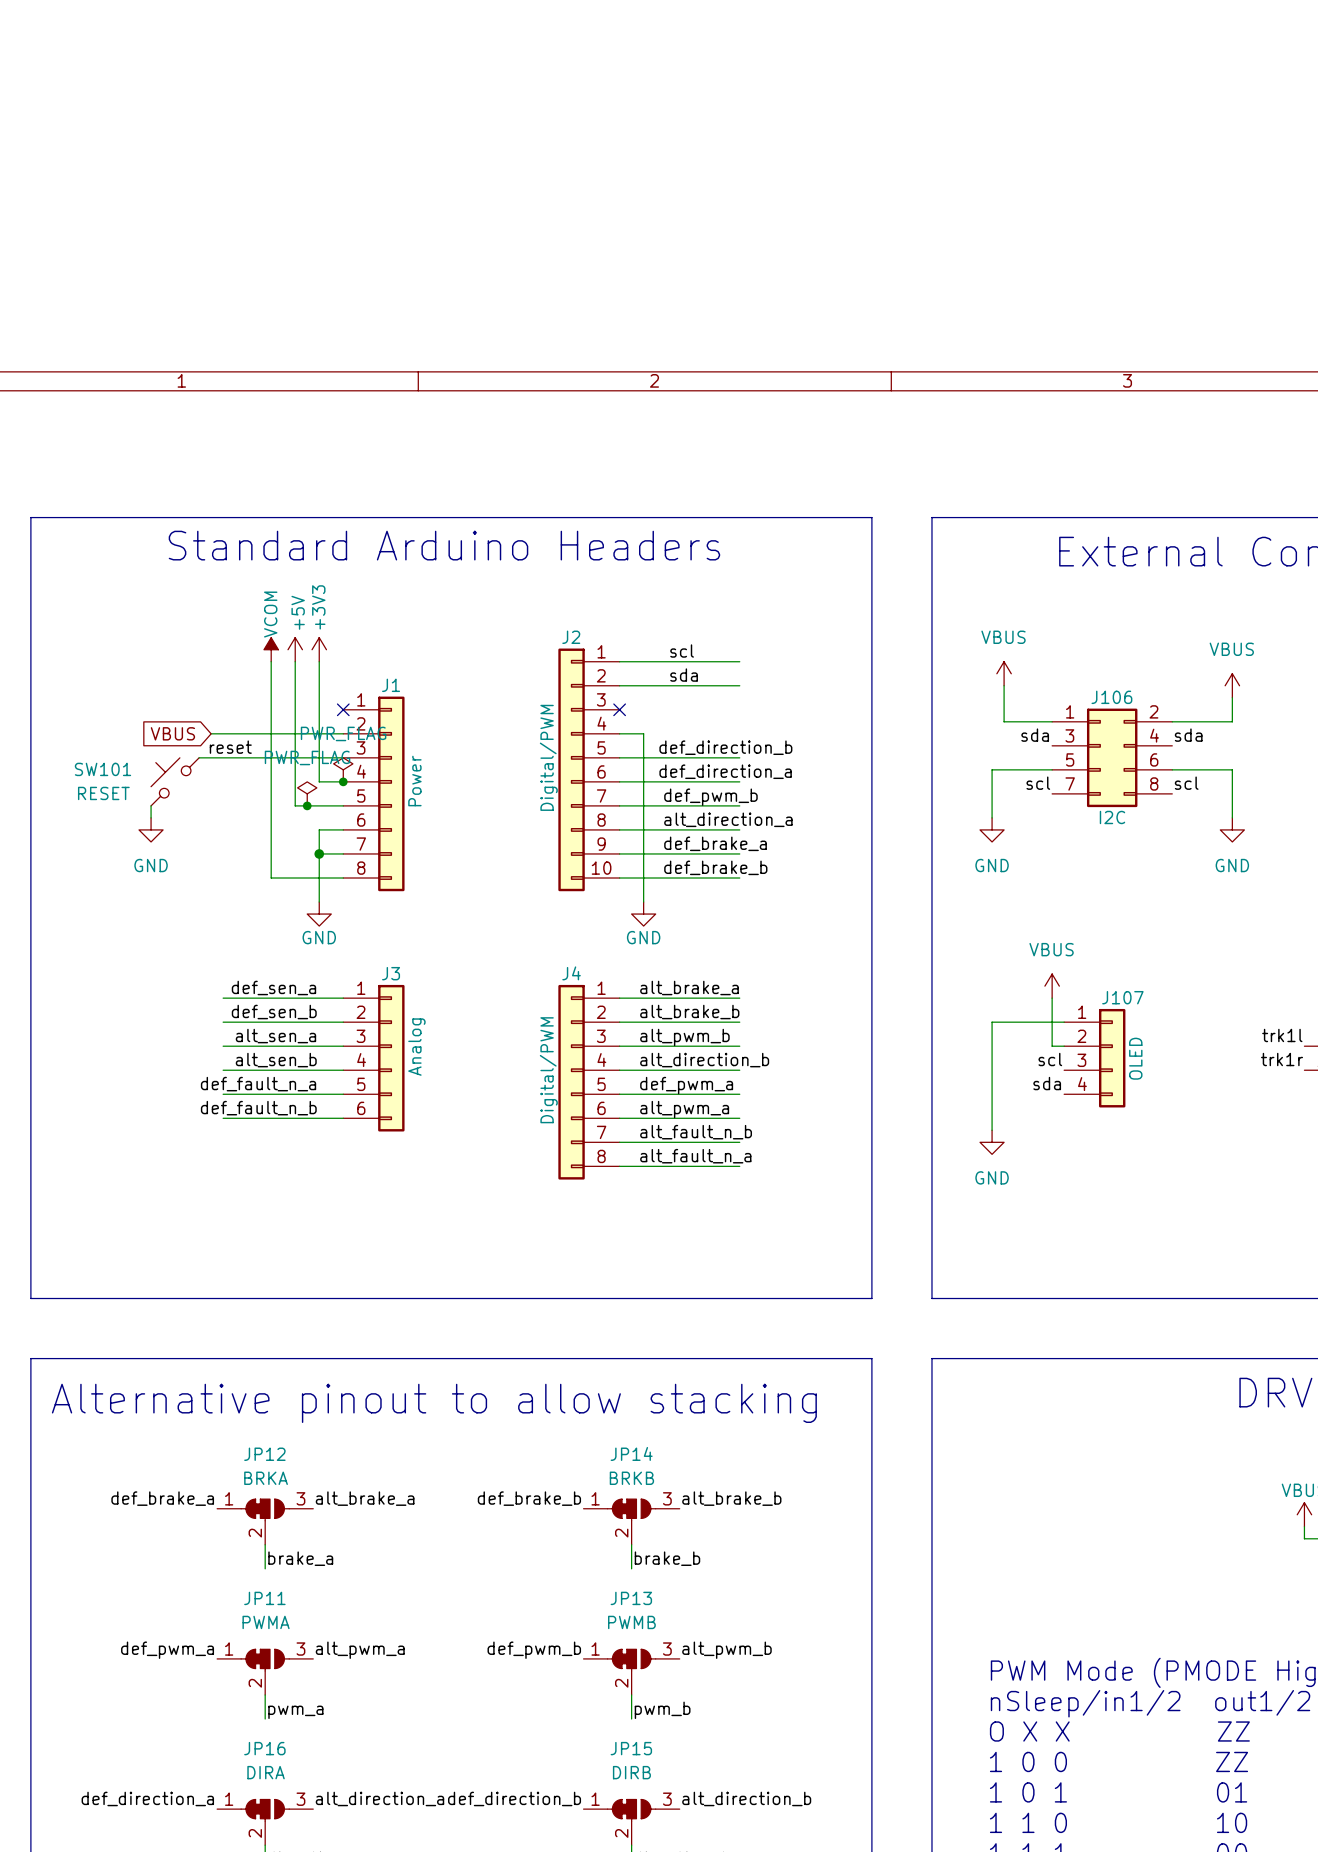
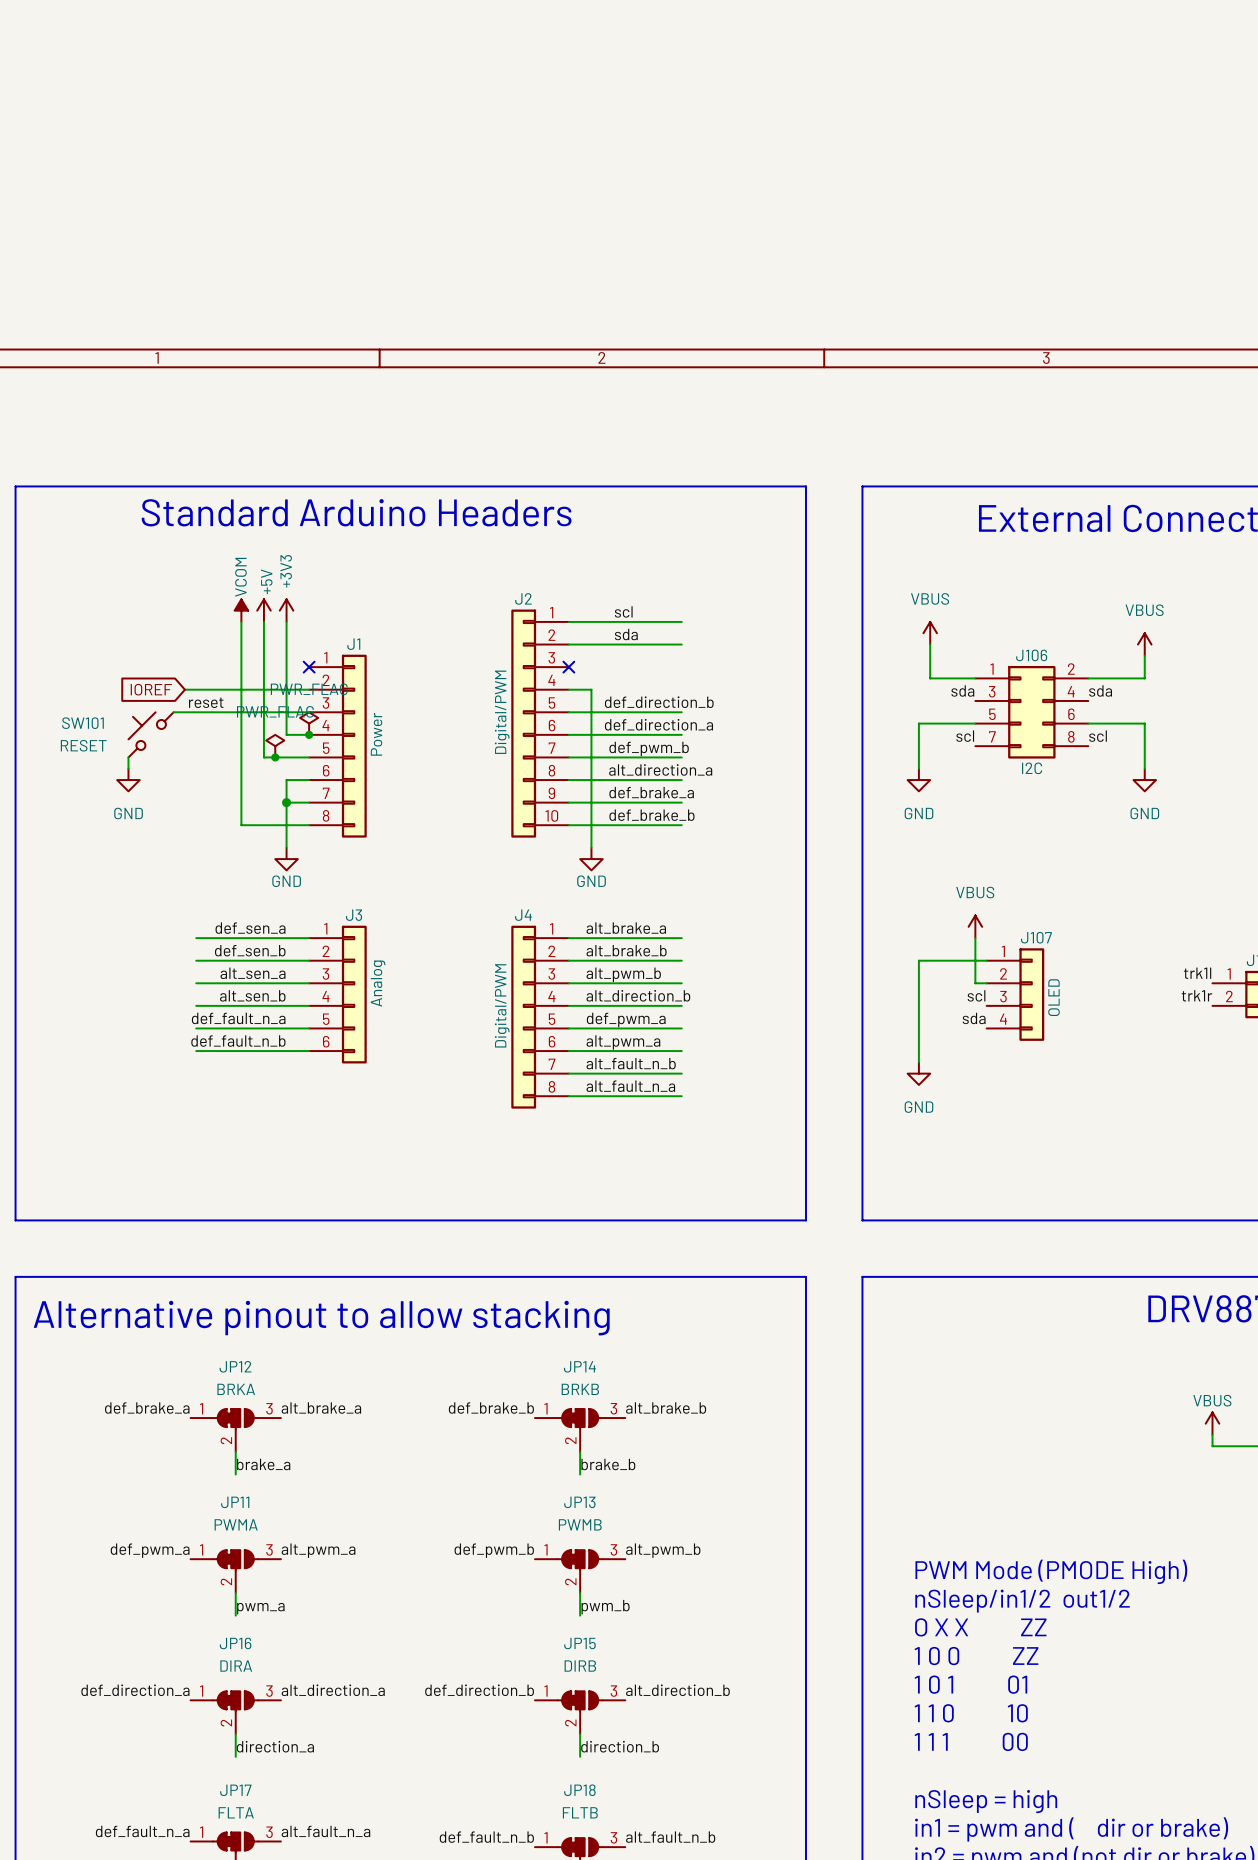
global label: VBUS (172, 733) -> IOREF (151, 689)

